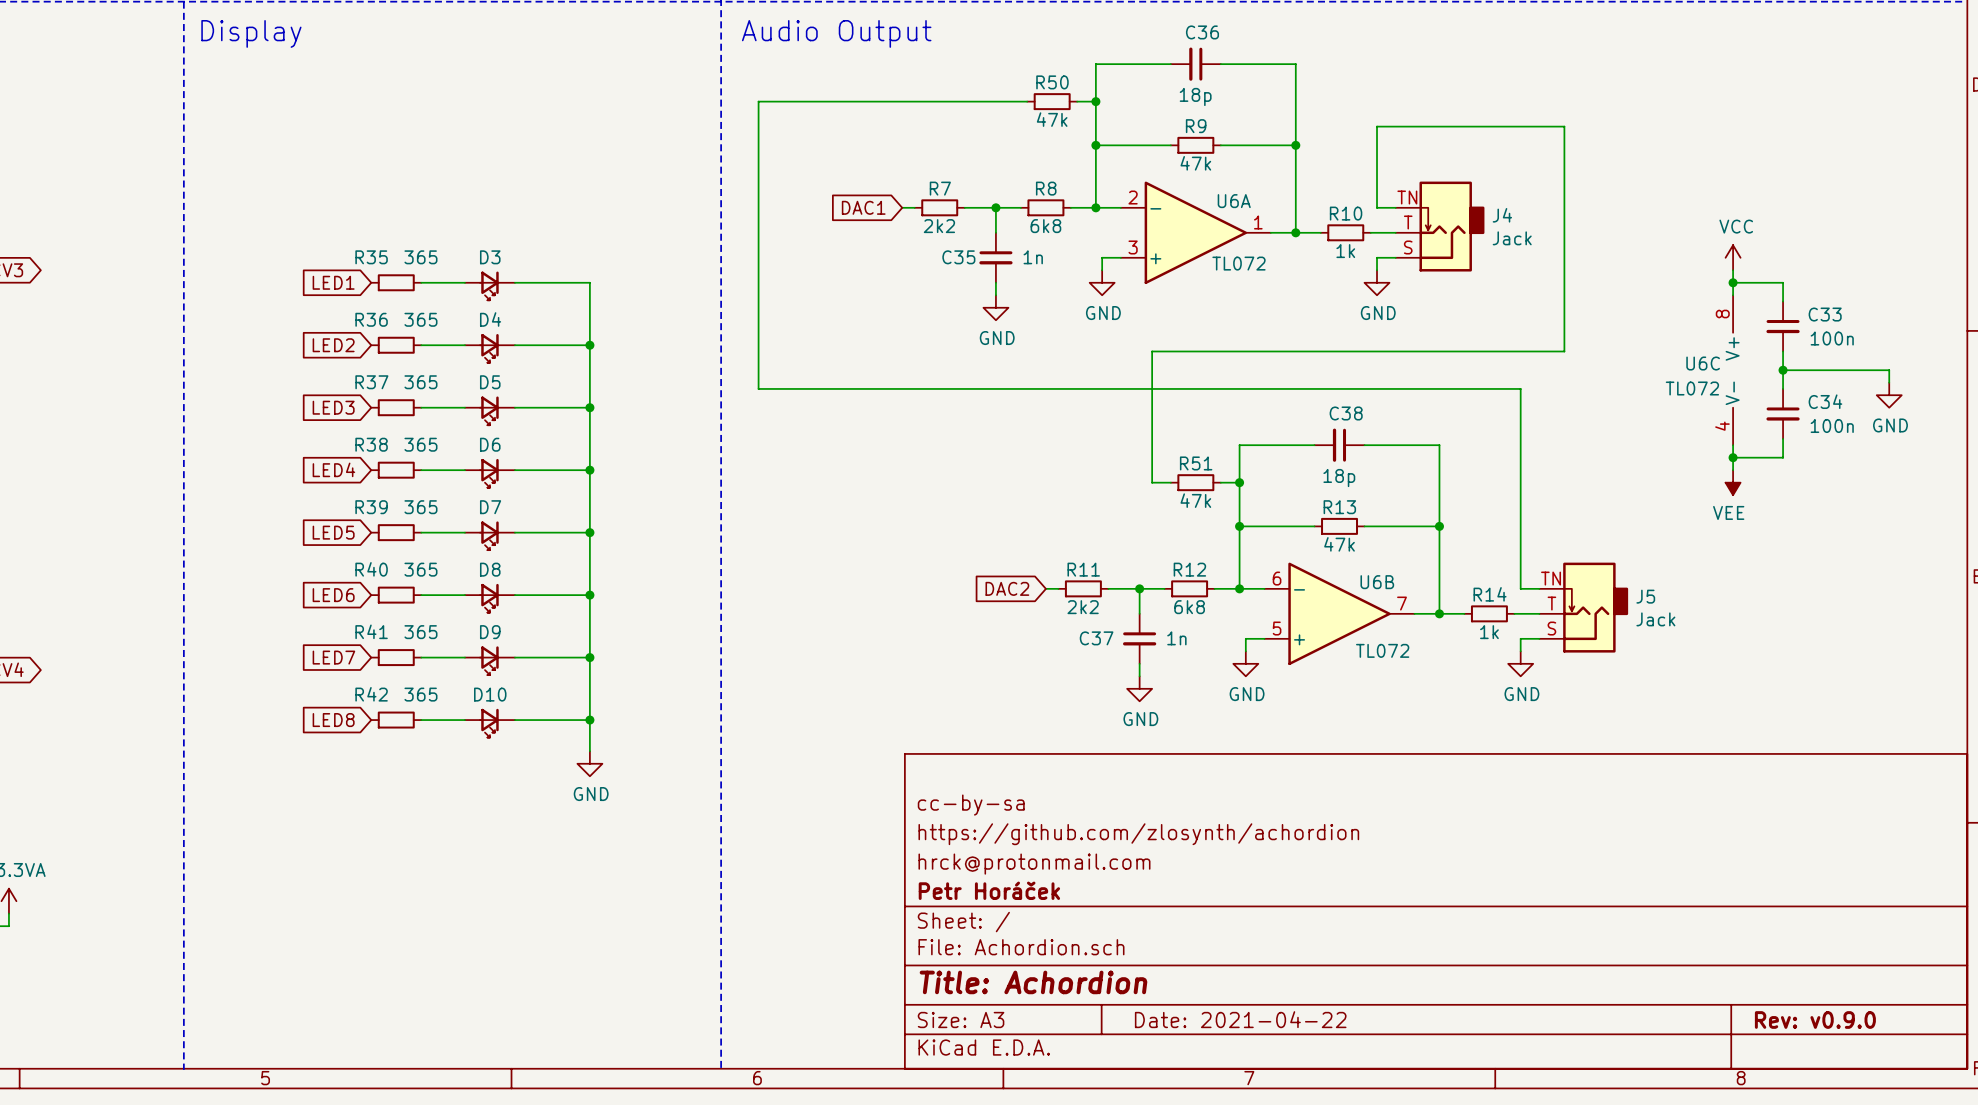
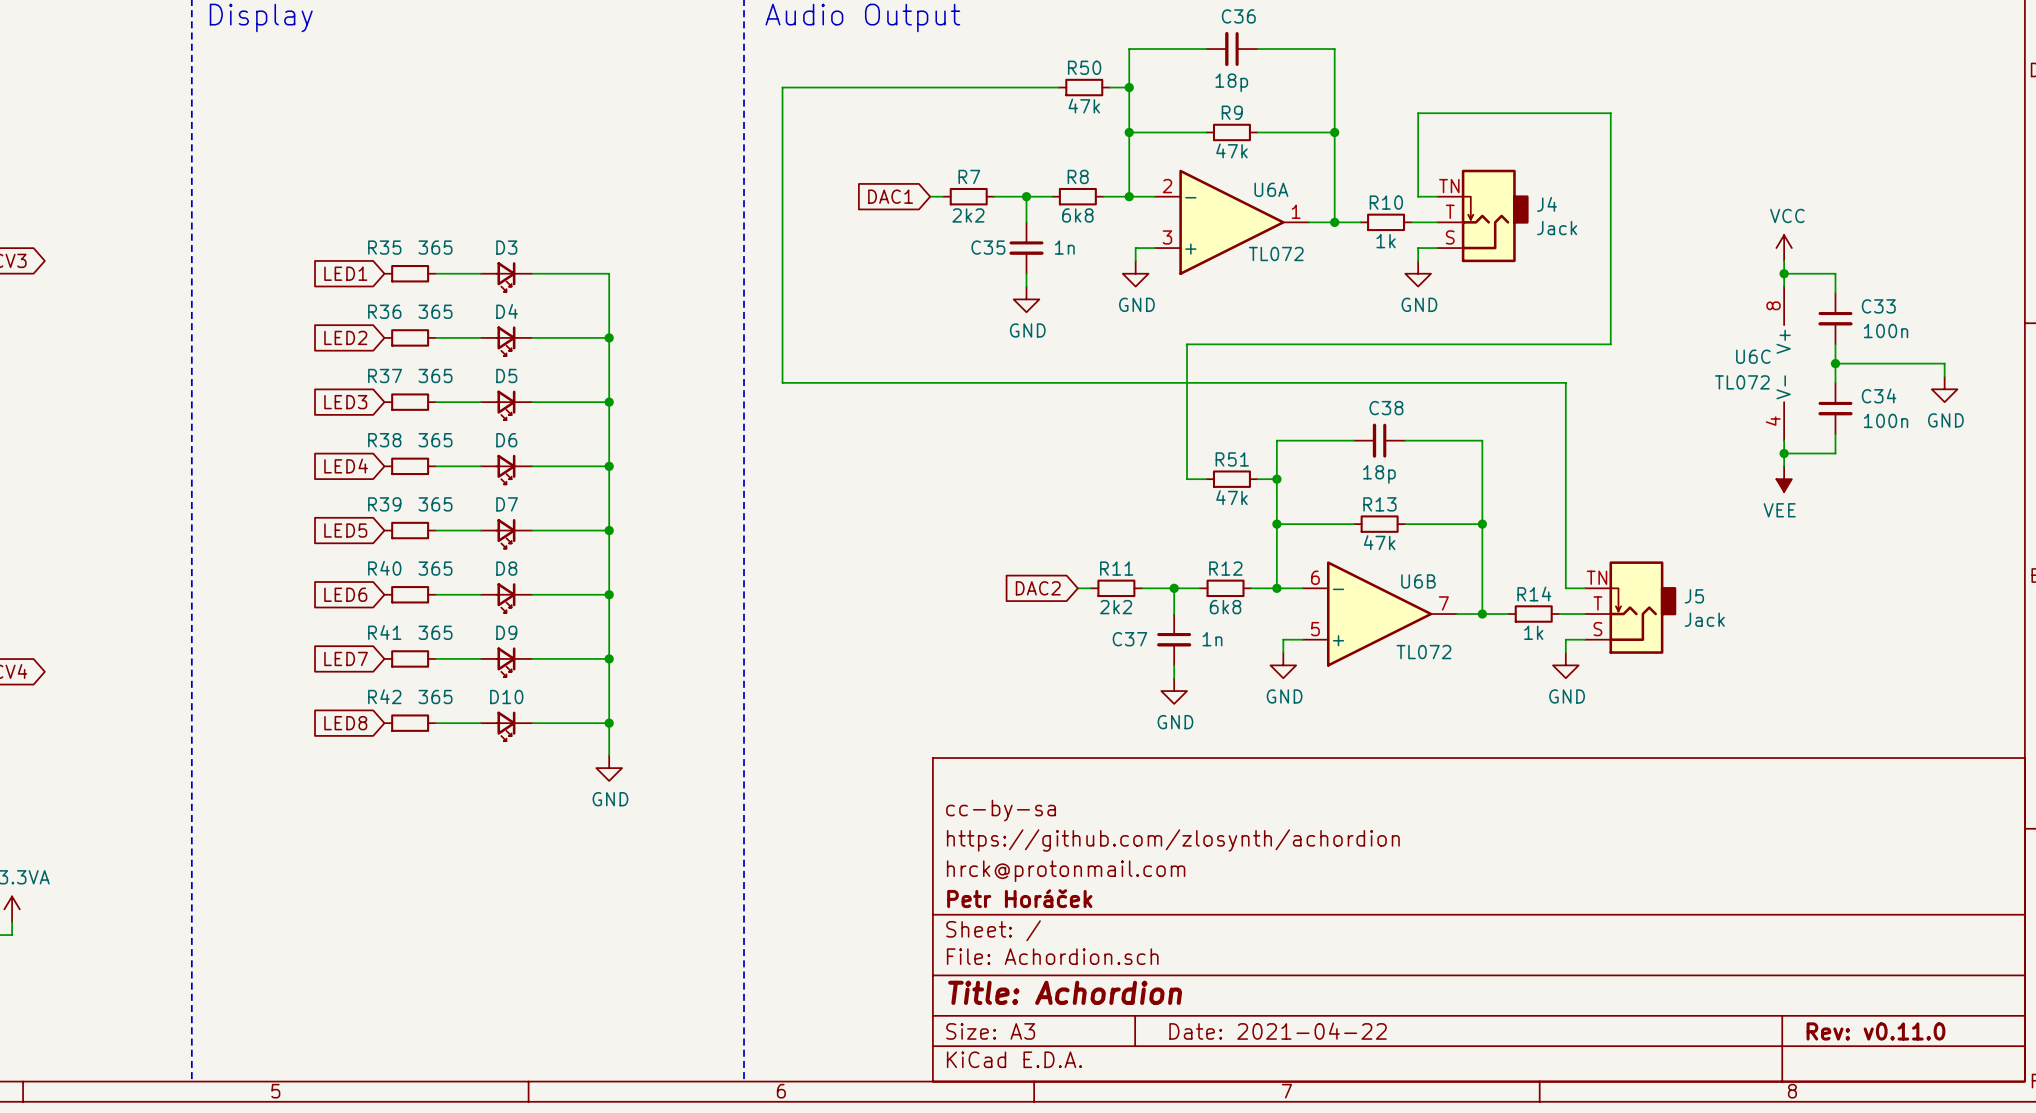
title block: Rev: v0.9.0 (1815, 1020) -> Rev: v0.11.0 (1875, 1031)

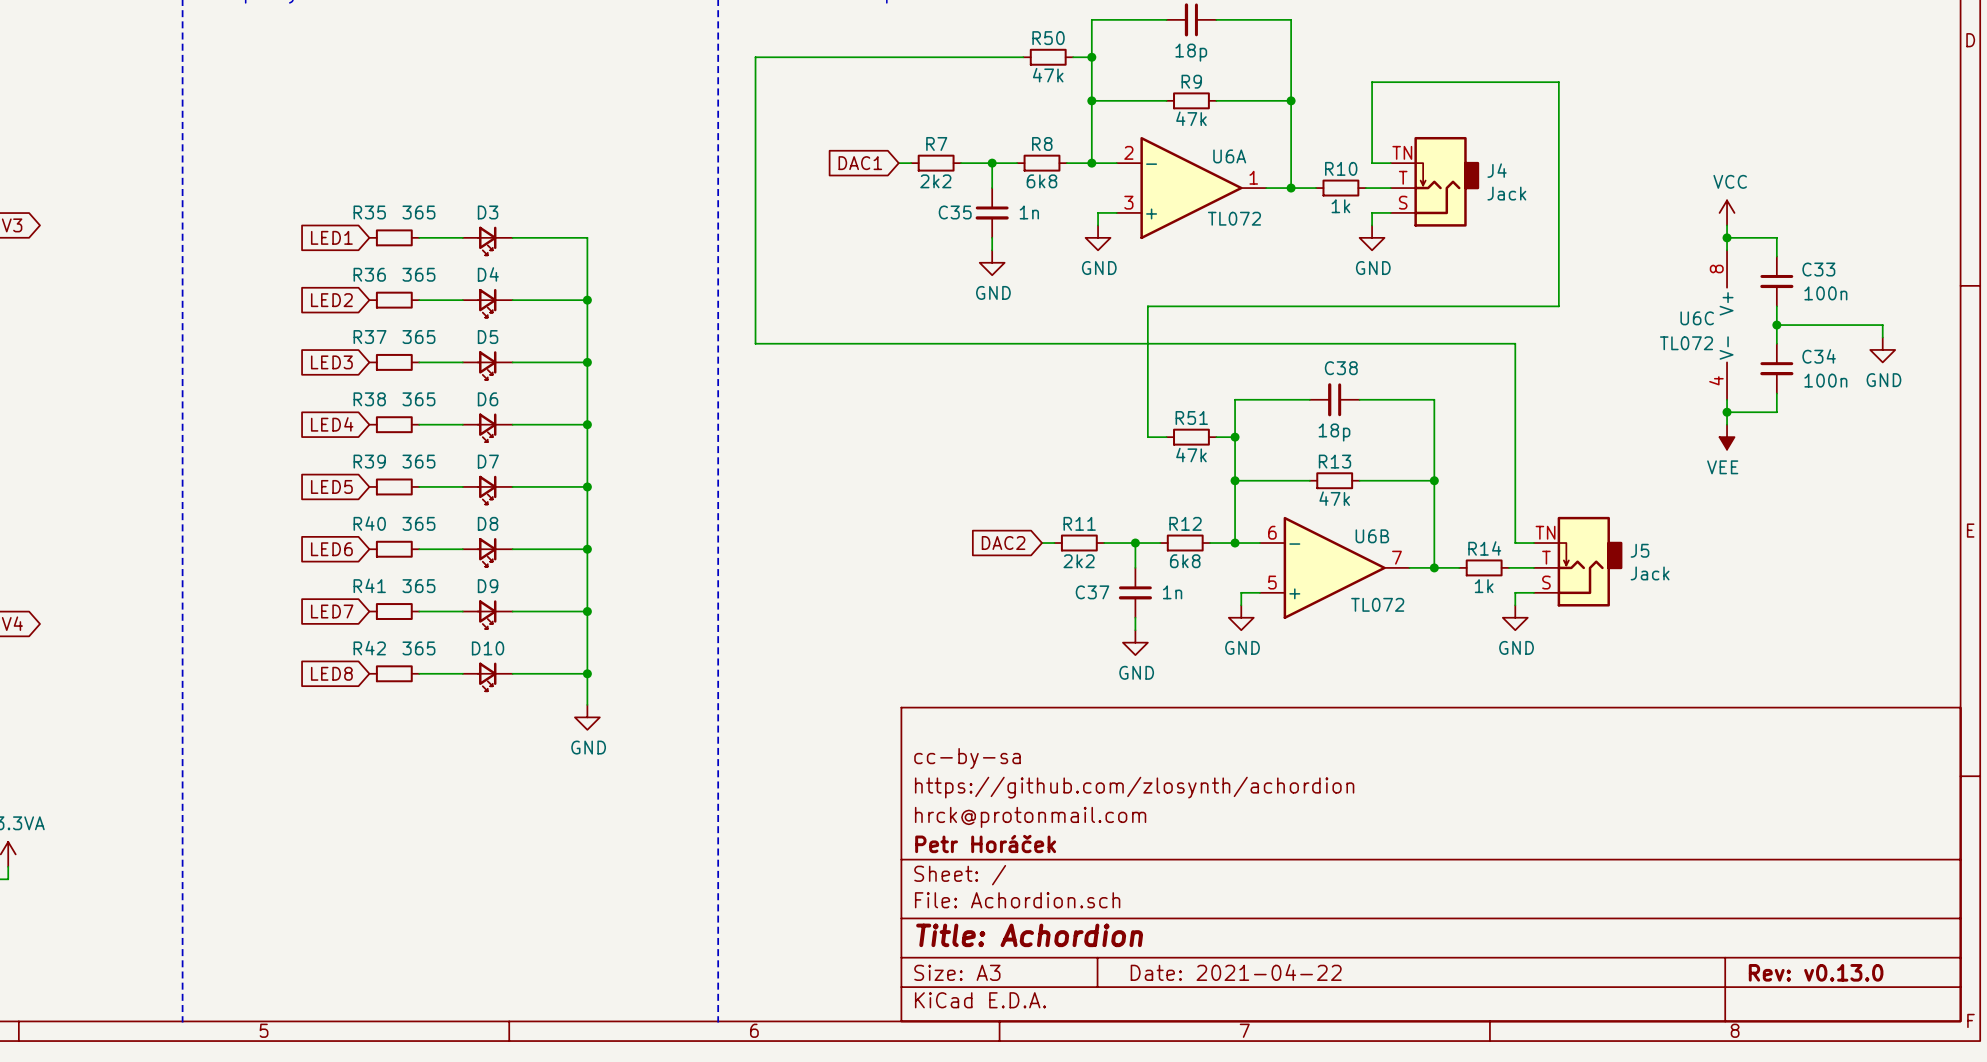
title block: Rev: v0.11.0 (1875, 1031) -> Rev: v0.13.0 (1816, 972)

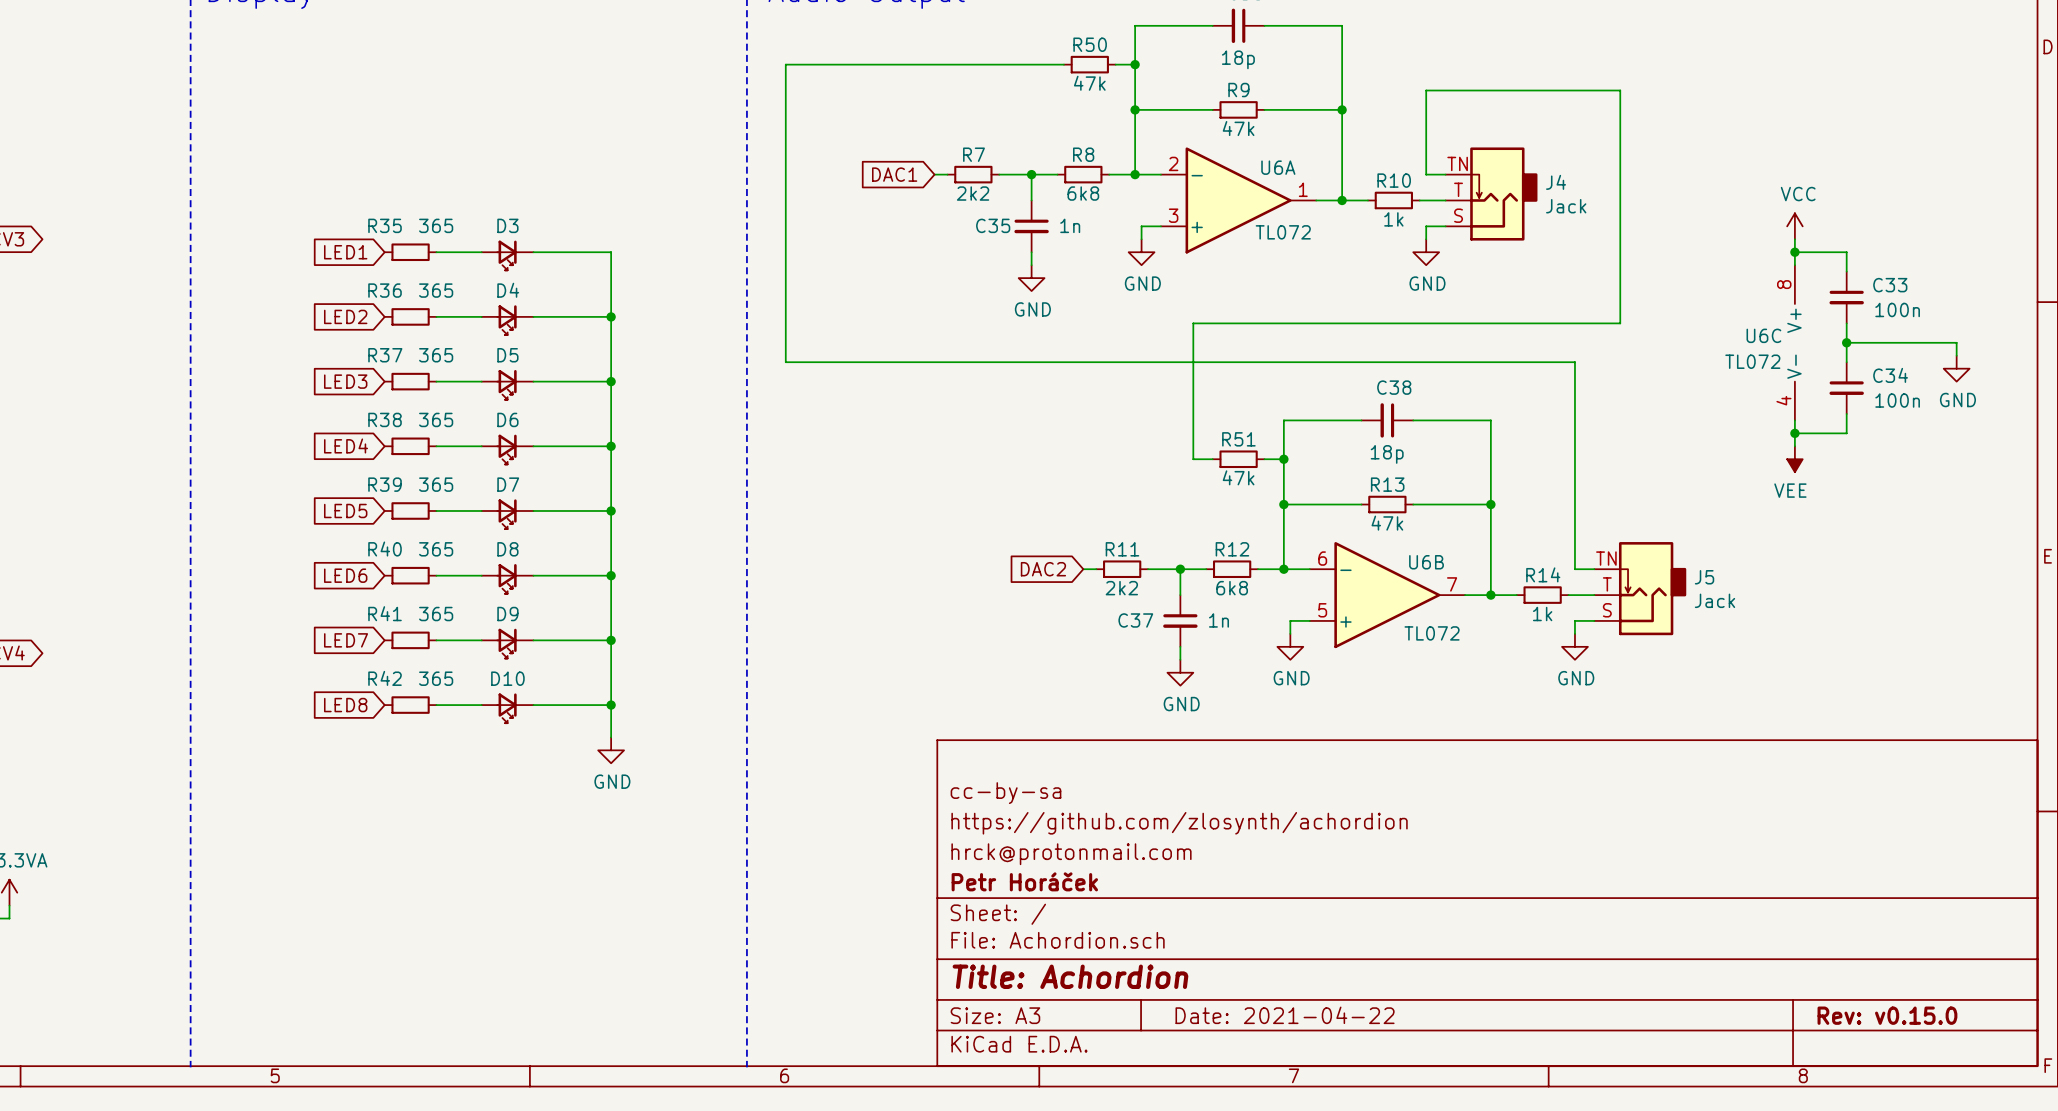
title block: Rev: v0.13.0 (1816, 972) -> Rev: v0.15.0 (1887, 1015)

